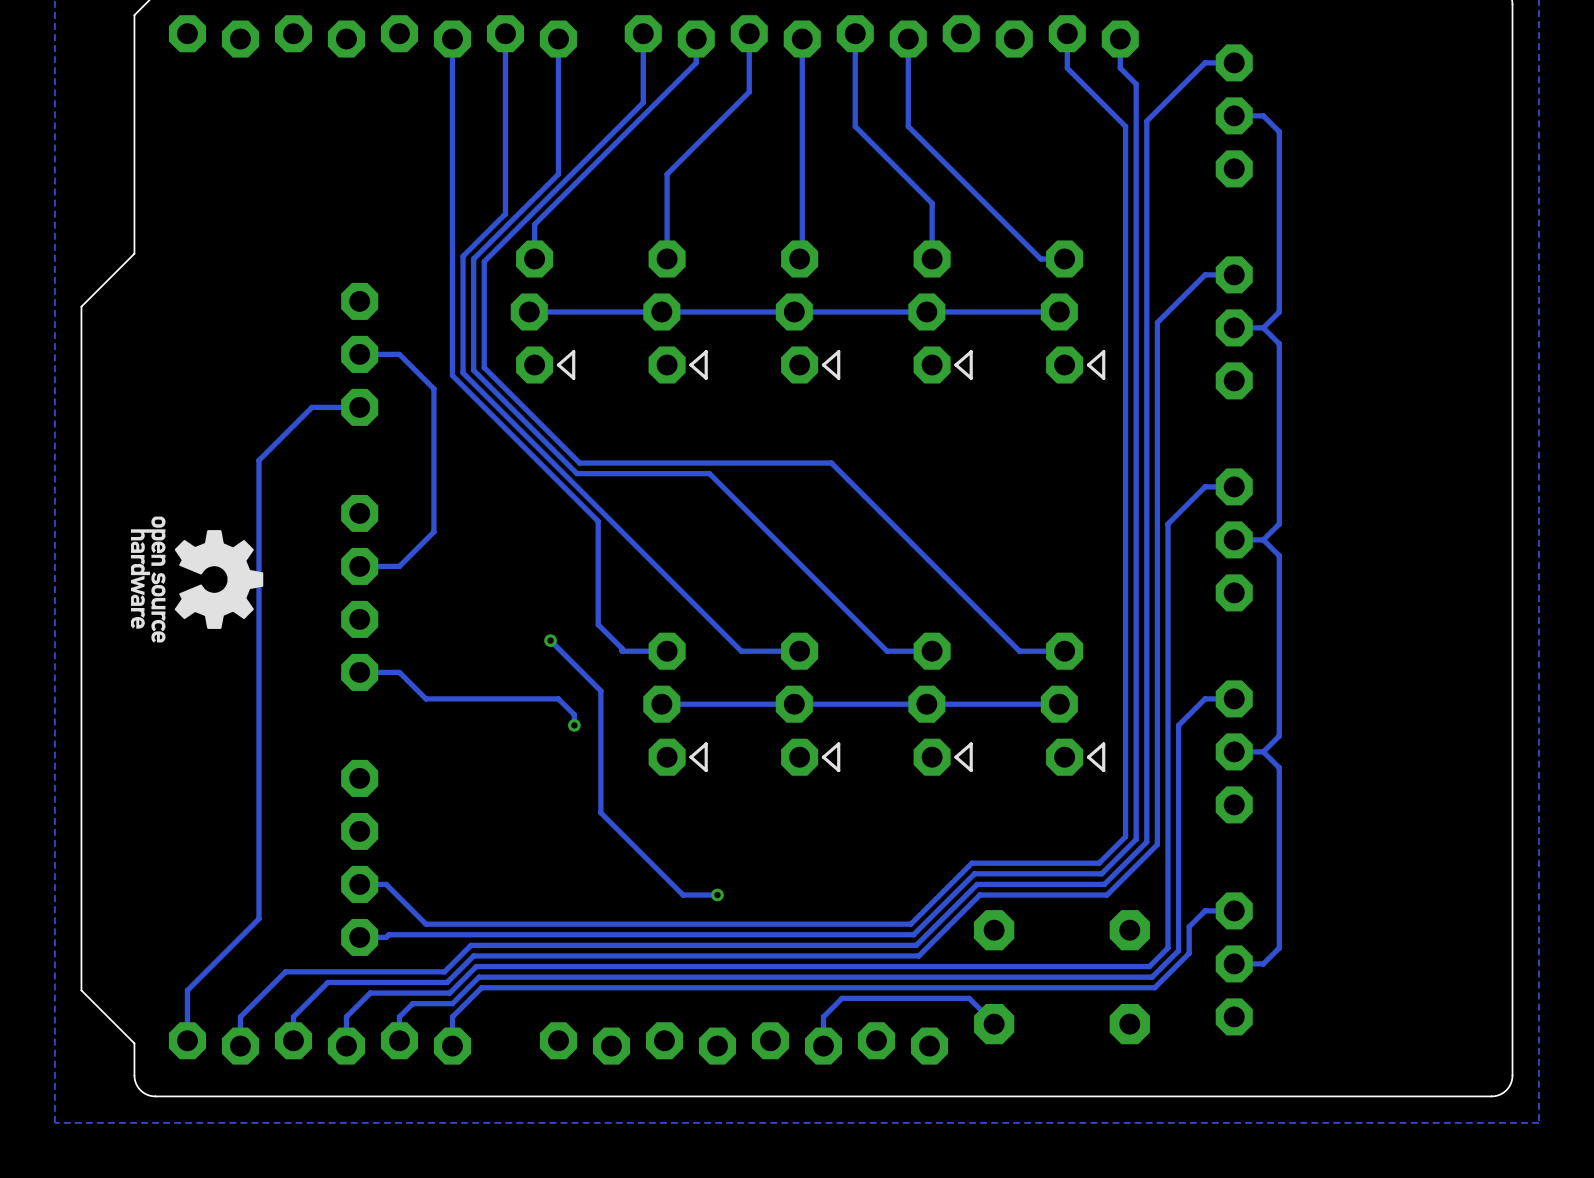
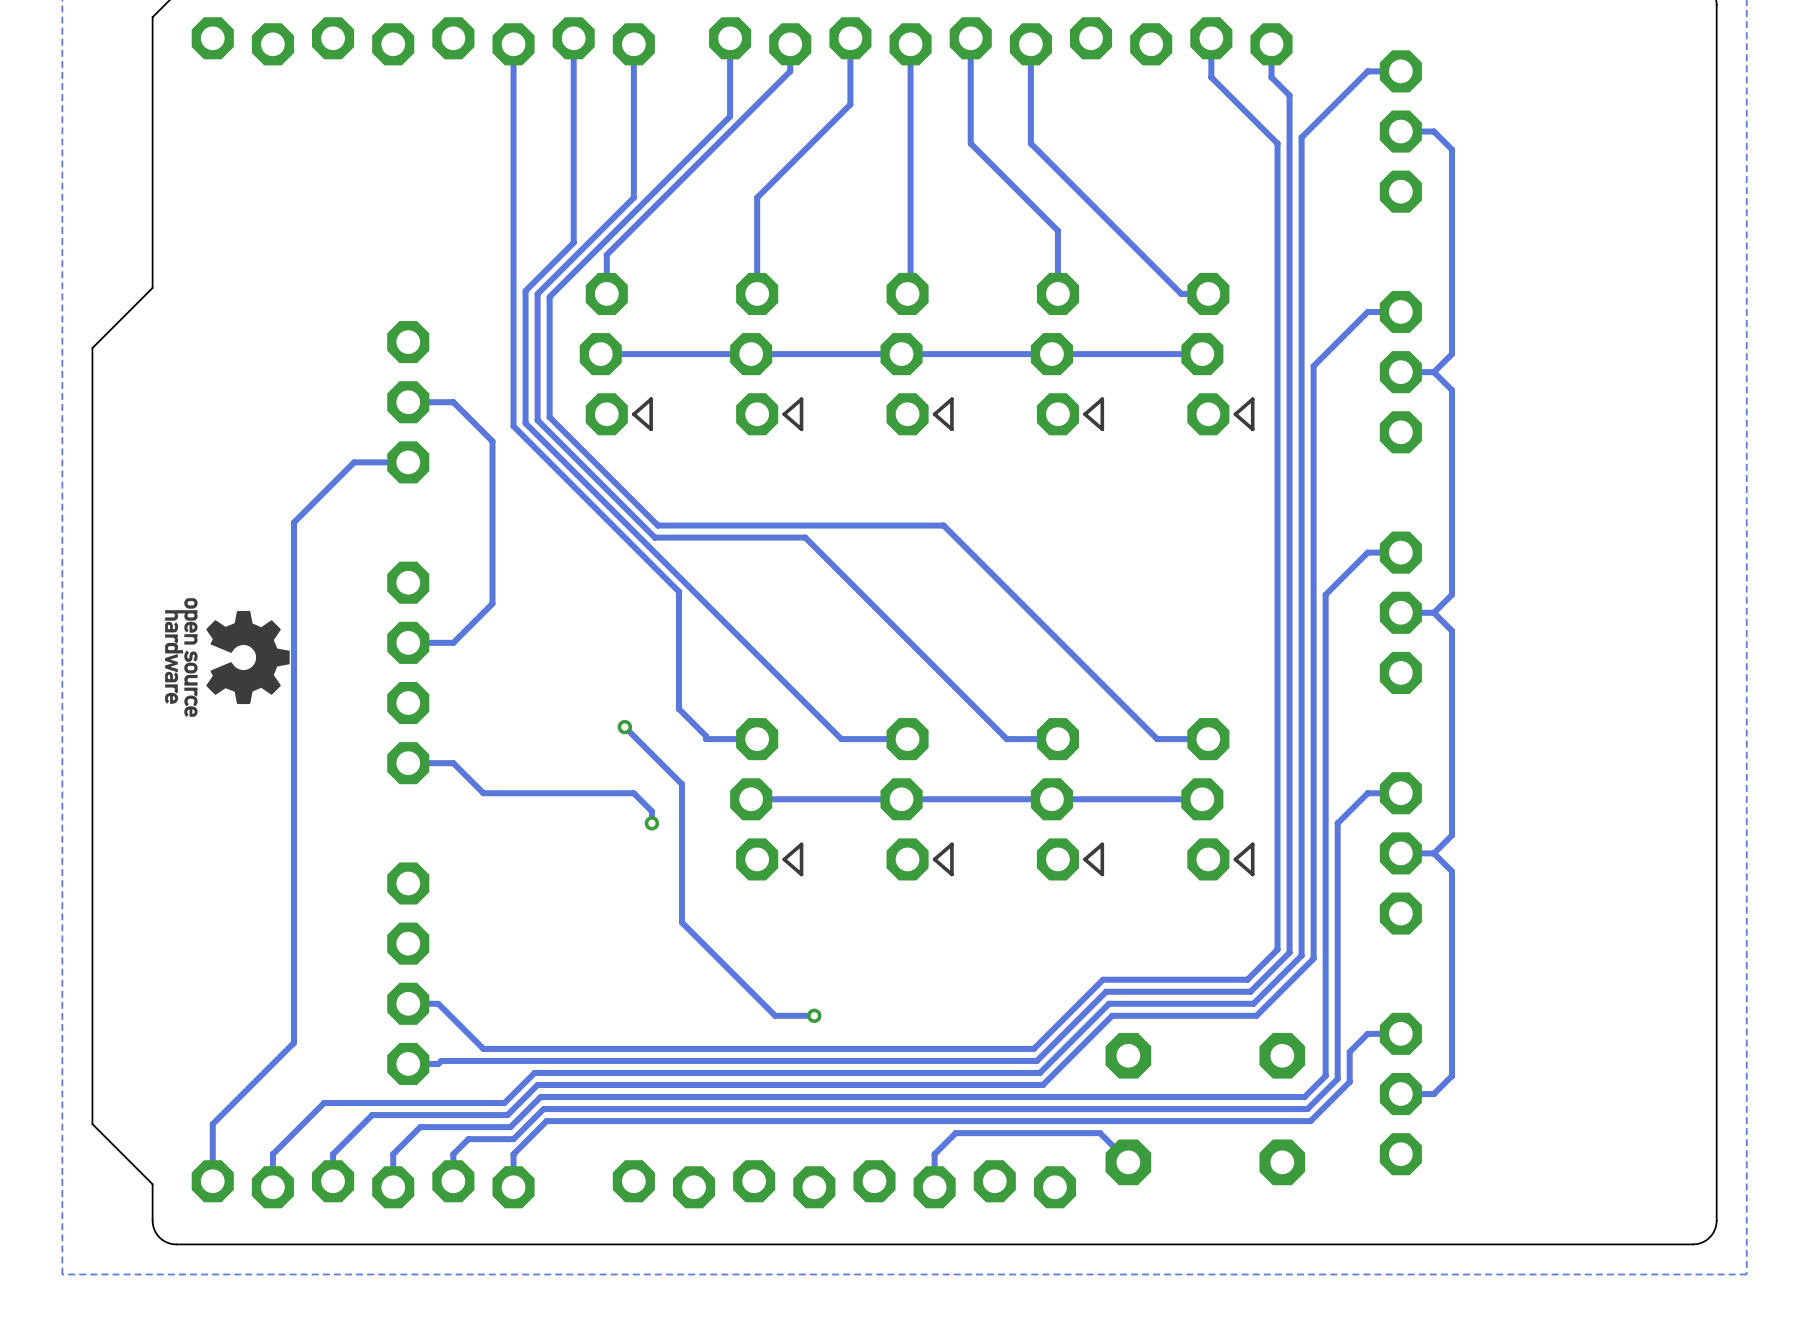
drawing shape: [131, 516, 264, 643] -> [165, 598, 290, 717]

